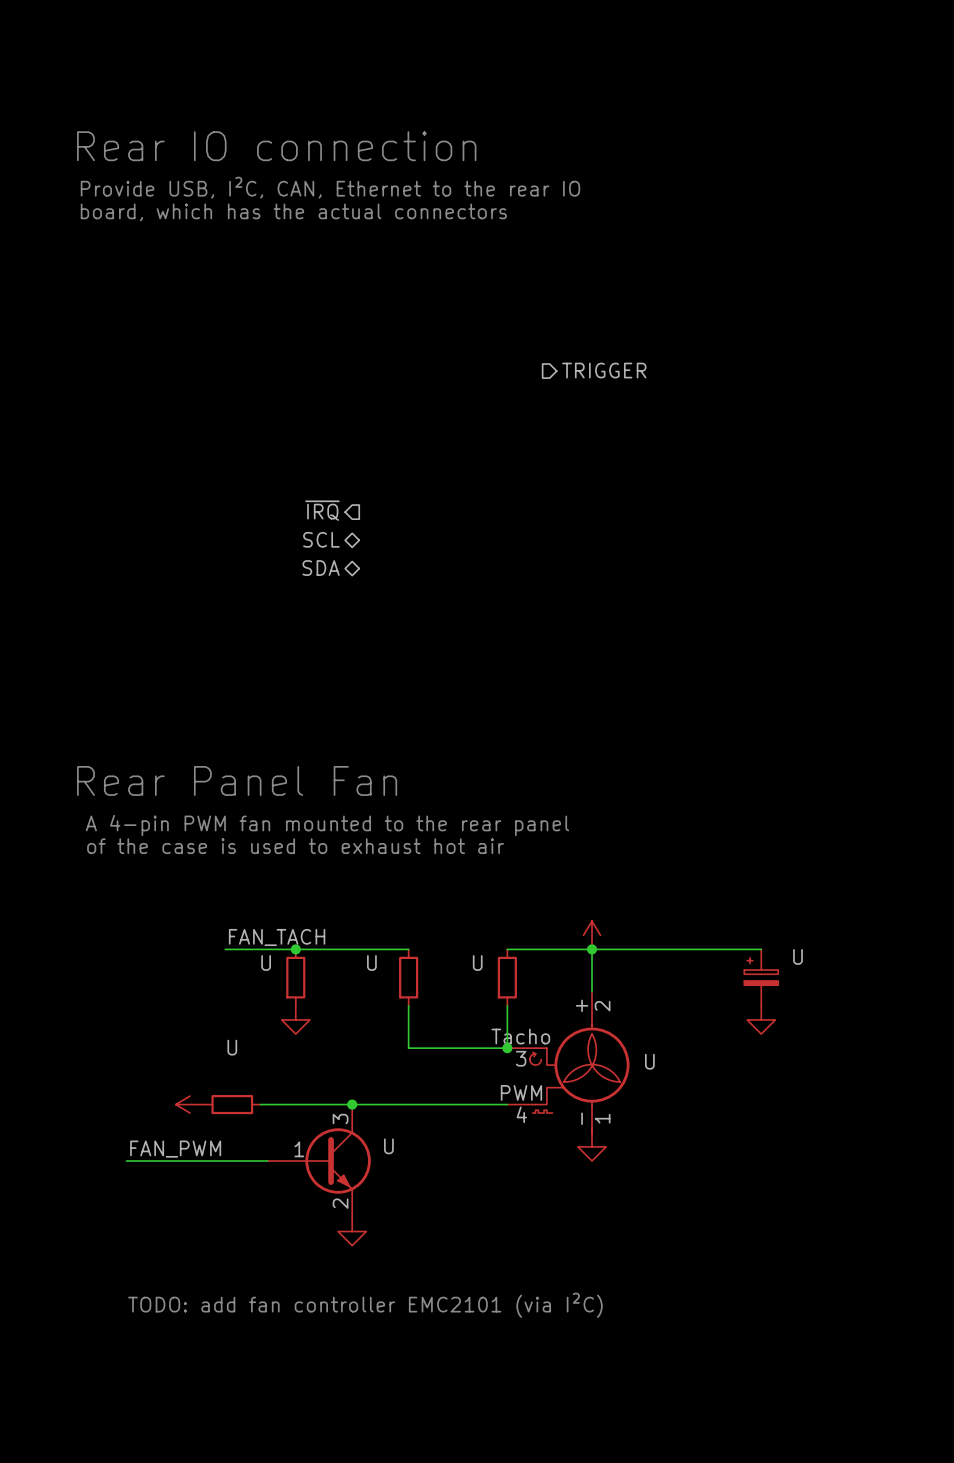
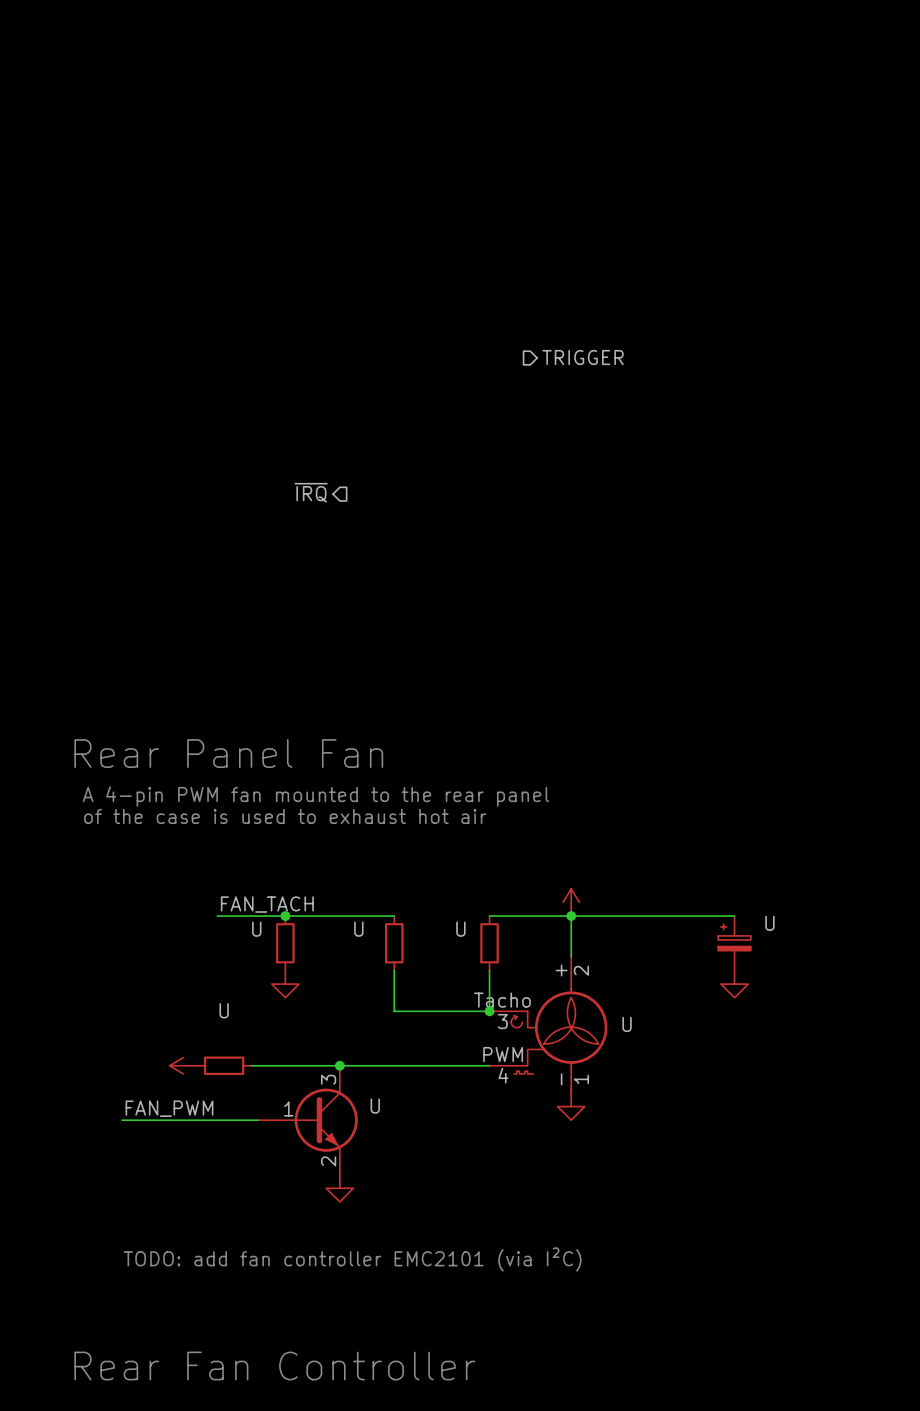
text: Rear IO connection (276, 146) -> none
text: Provide USB, I²C, CAN, Ethernet to the rear IO (330, 187) -> none
text: board, which has the actual connectors (293, 212) -> none
hierarchical label: SCL (321, 539) -> none
hierarchical label: SDA (321, 568) -> none
text: none -> Rear Fan Controller (274, 1365)

